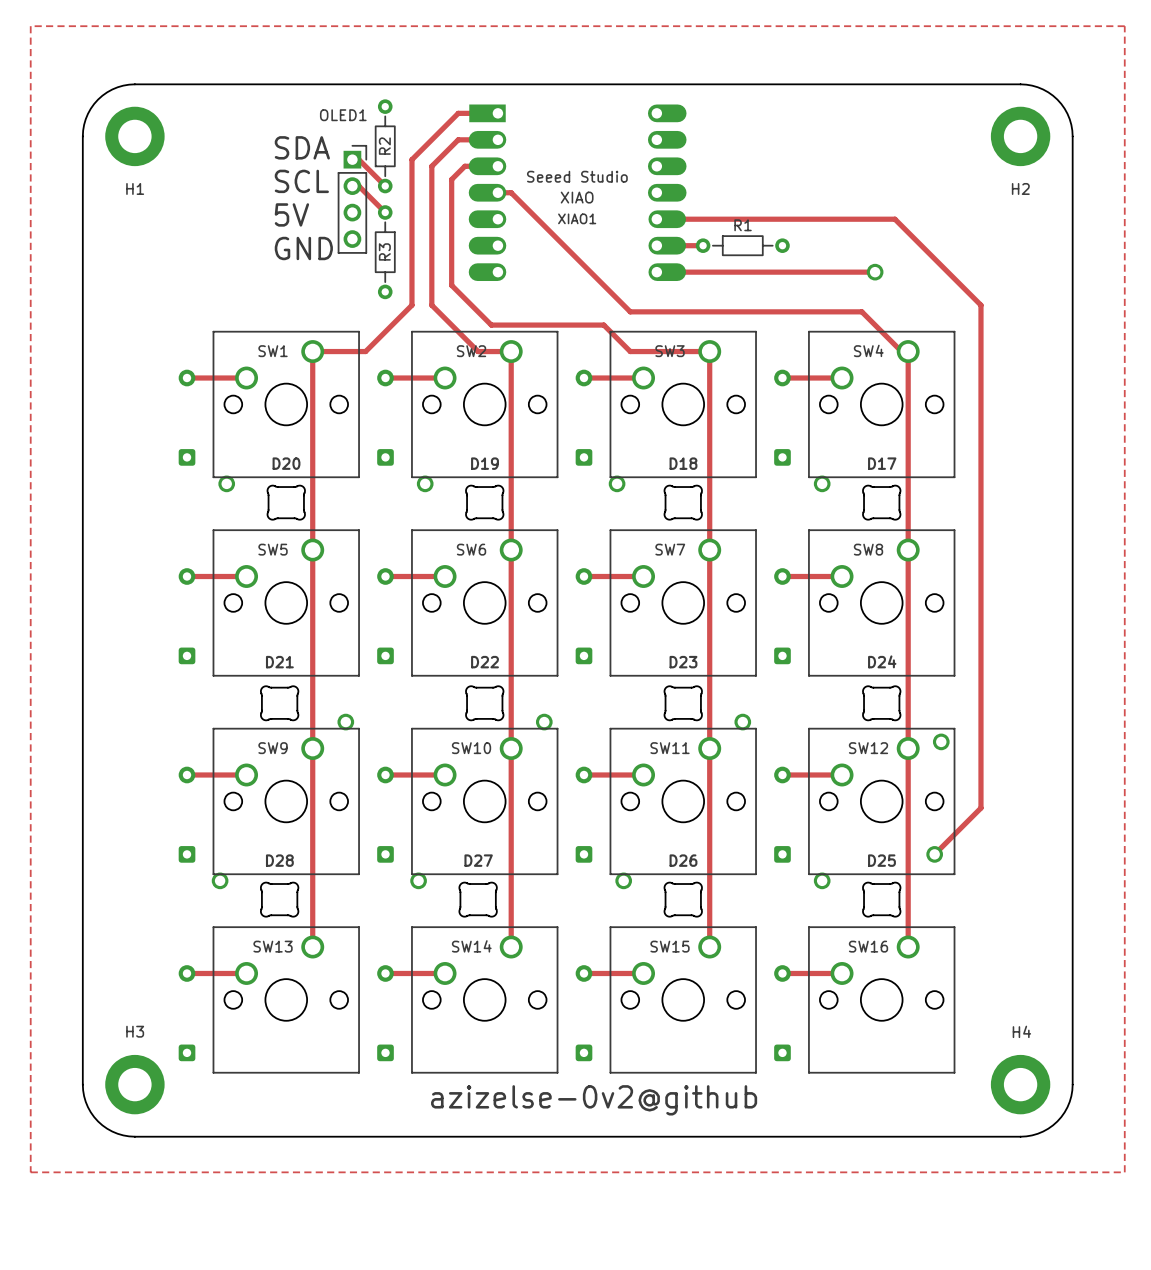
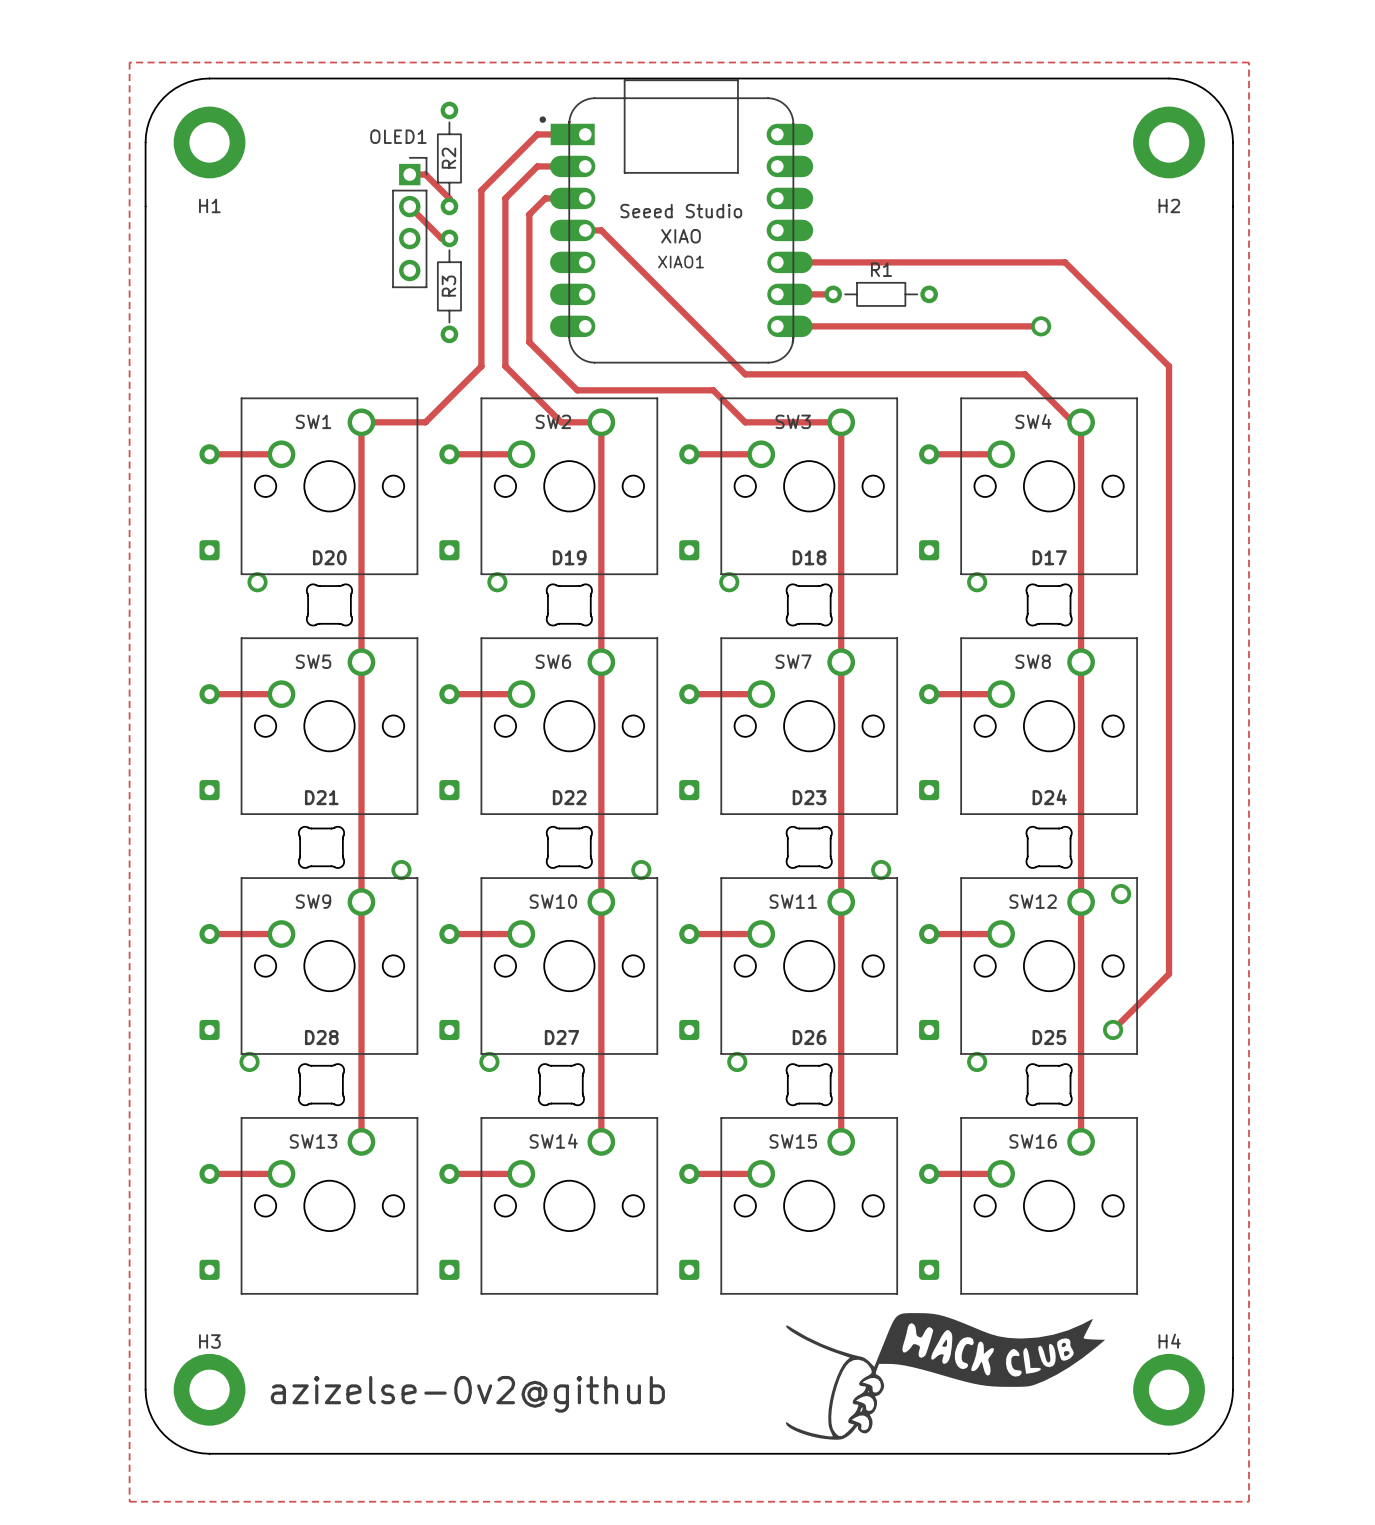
zone outline: (30, 26) (30, 1172) (1124, 1172) (1124, 26) (30, 26) -> (129, 62) (129, 1501) (1248, 1501) (1248, 62) (129, 62)
board edge: (134, 84) (1020, 84) (1043, 89) (1061, 103) (1069, 119) (1072, 136) (1072, 1084) (1067, 1107) (1053, 1125) (1037, 1133) (1020, 1136) (134, 1136) (112, 1131) (94, 1117) (85, 1101) (82, 1084) (82, 136) (87, 113) (98, 99) (117, 87) (134, 84) -> (209, 78) (188, 82) (175, 88) (164, 97) (155, 108) (149, 121) (145, 142) (145, 1389) (149, 1410) (159, 1429) (169, 1439) (181, 1447) (195, 1452) (209, 1453) (1169, 1453) (1190, 1450) (1208, 1439) (1219, 1429) (1226, 1417) (1231, 1404) (1233, 1389) (1233, 142) (1229, 121) (1219, 102) (1208, 92) (1196, 84) (1183, 80) (1169, 78) (209, 78)
XIAO1 footprint: [468, 104, 687, 282] -> [539, 79, 814, 364]
H1 position: (134, 136) -> (209, 142)
H2 position: (1020, 136) -> (1169, 142)
track: none -> (409, 174) (425, 174) (449, 198) (449, 206)
R2 position: (385, 146) -> (449, 158)
text: SDA (302, 147) -> none
track: (352, 159) (358, 159) (385, 186) -> none
track: none -> (409, 206) (441, 238) (449, 238)
text: SCL (301, 181) -> none
track: (352, 186) (358, 186) (385, 212) -> none
OLED1 position: (352, 199) -> (409, 222)
text: 5V (291, 214) -> none
text: GND (303, 248) -> none
R3 position: (385, 252) -> (449, 286)
H3 name position: H3 (135, 1031) -> H3 (209, 1341)
H4 name position: H4 (1021, 1031) -> H4 (1169, 1341)
H3 position: (134, 1084) -> (209, 1389)
H4 position: (1020, 1084) -> (1169, 1389)
drawing: none -> [786, 1313, 1106, 1440]
text position: azizelse-0v2@github (594, 1100) -> azizelse-0v2@github (467, 1394)

